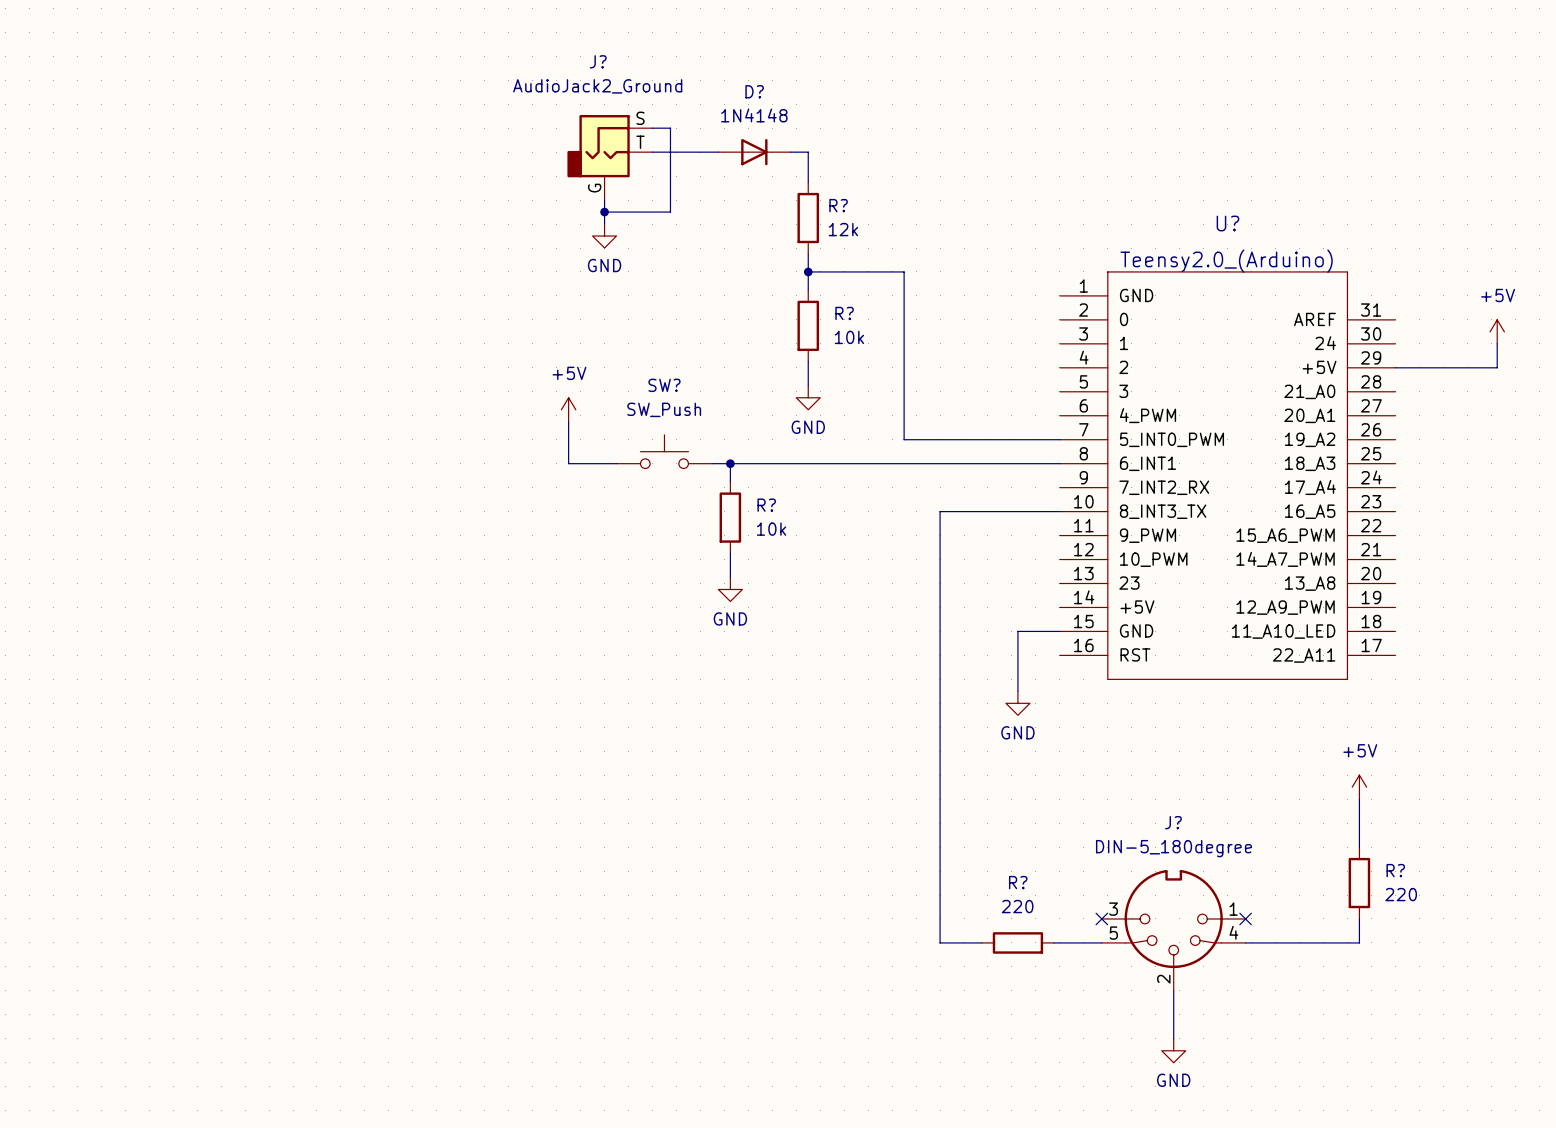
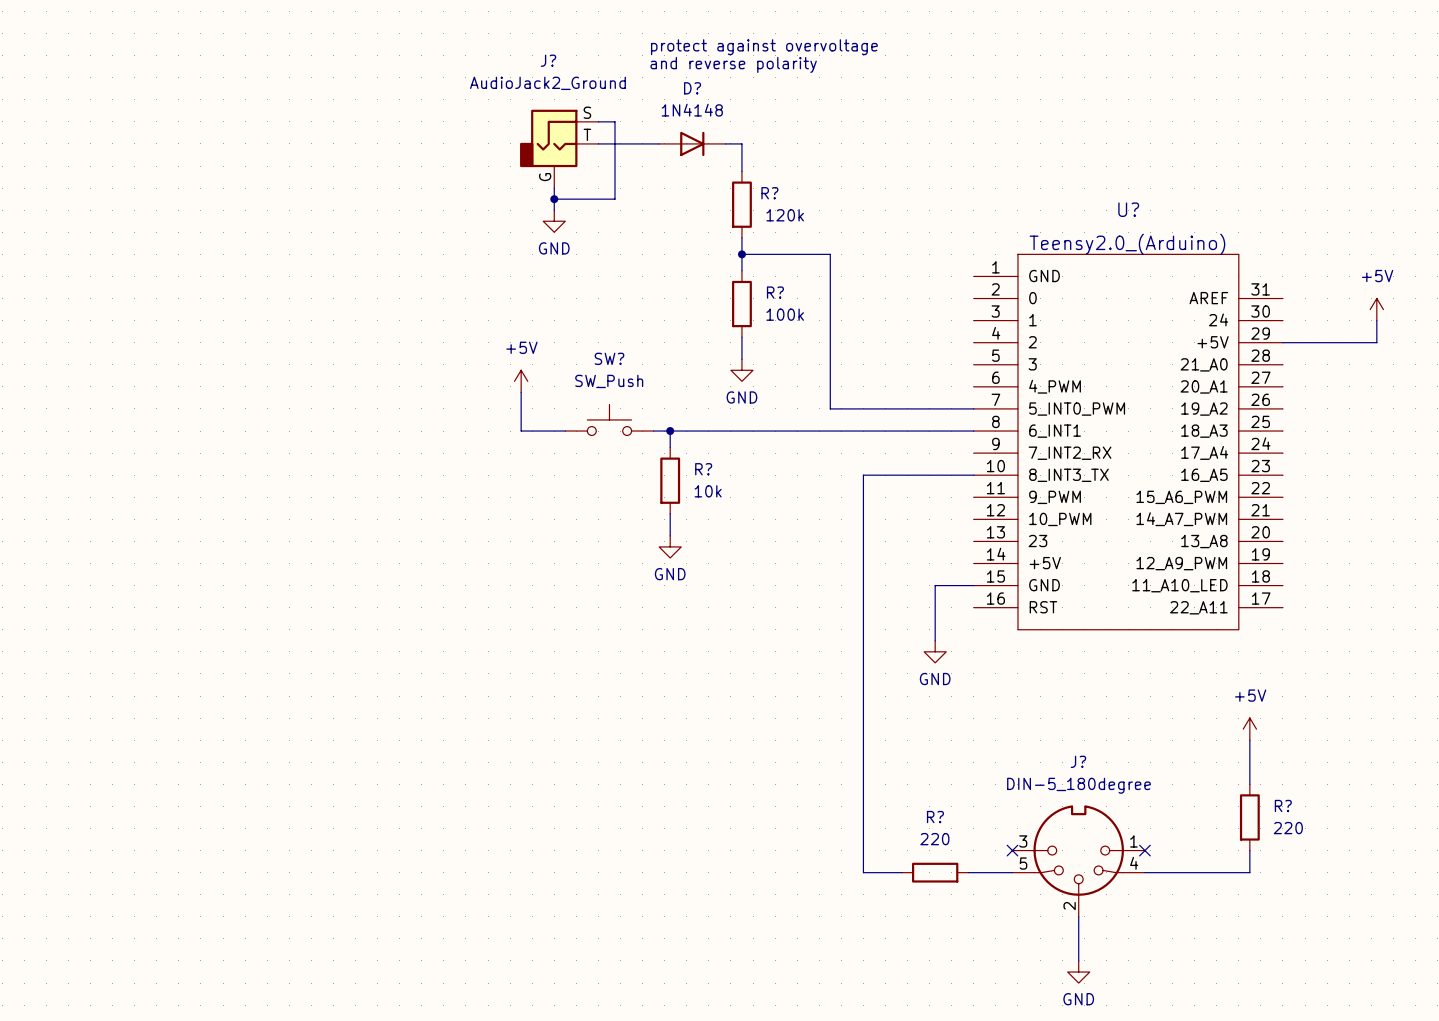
text: none -> protect against overvoltage (764, 47)
text: none -> and reverse polarity (733, 64)
R? value: 12k (843, 229) -> 120k (785, 215)
R? value: 10k (849, 337) -> 100k (785, 314)

